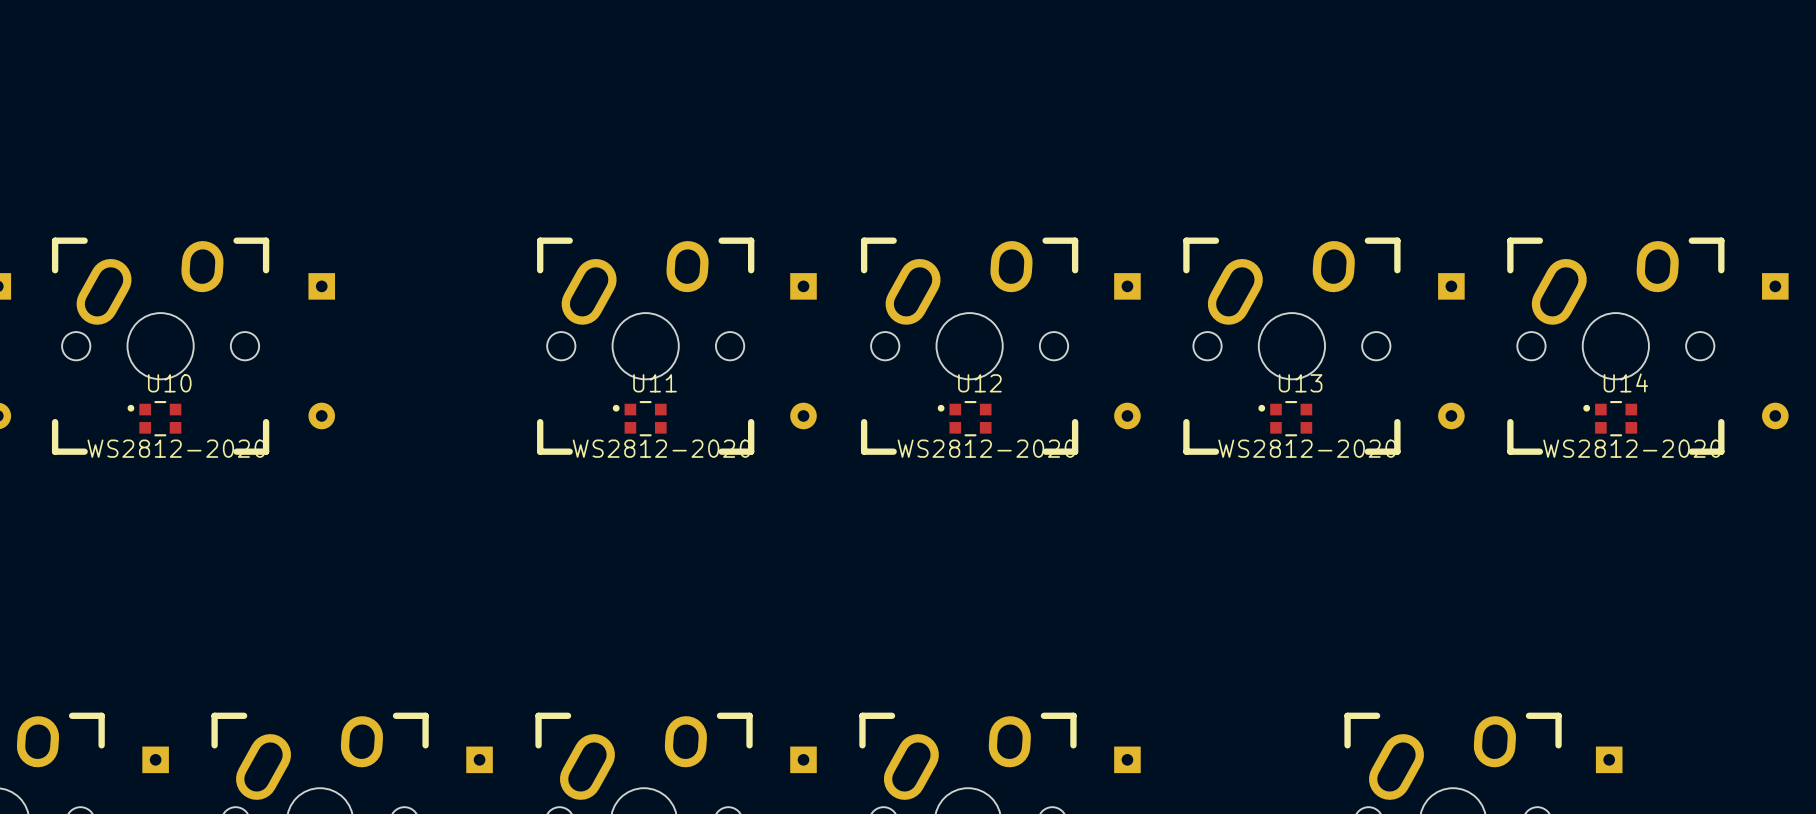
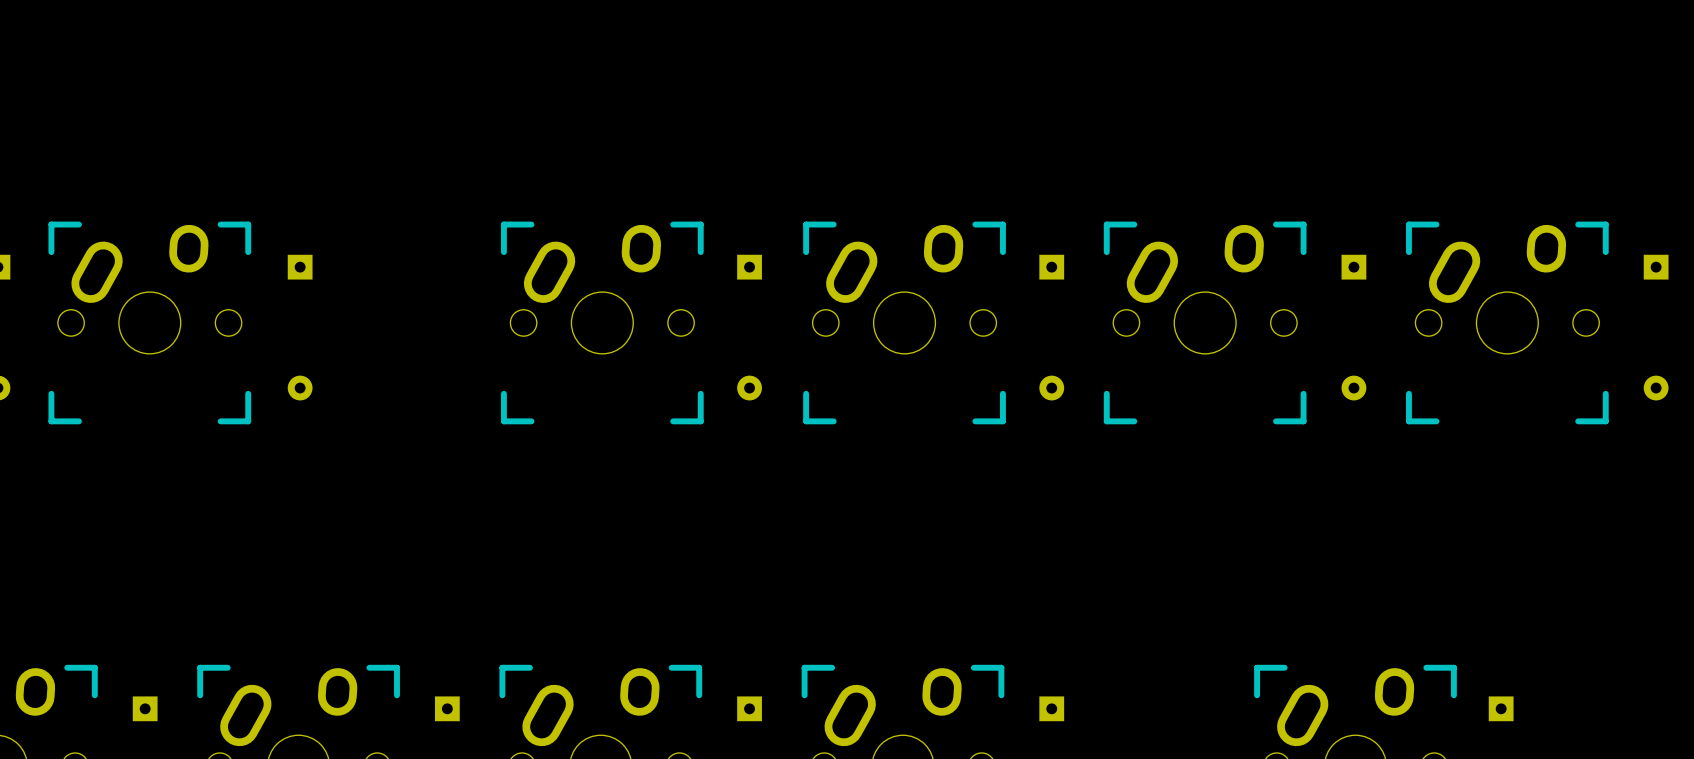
U10: WS2812-2020 (154, 418) -> none
U11: WS2812-2020 (639, 418) -> none
U12: WS2812-2020 (964, 418) -> none
U13: WS2812-2020 (1285, 418) -> none
U14: WS2812-2020 (1610, 418) -> none

